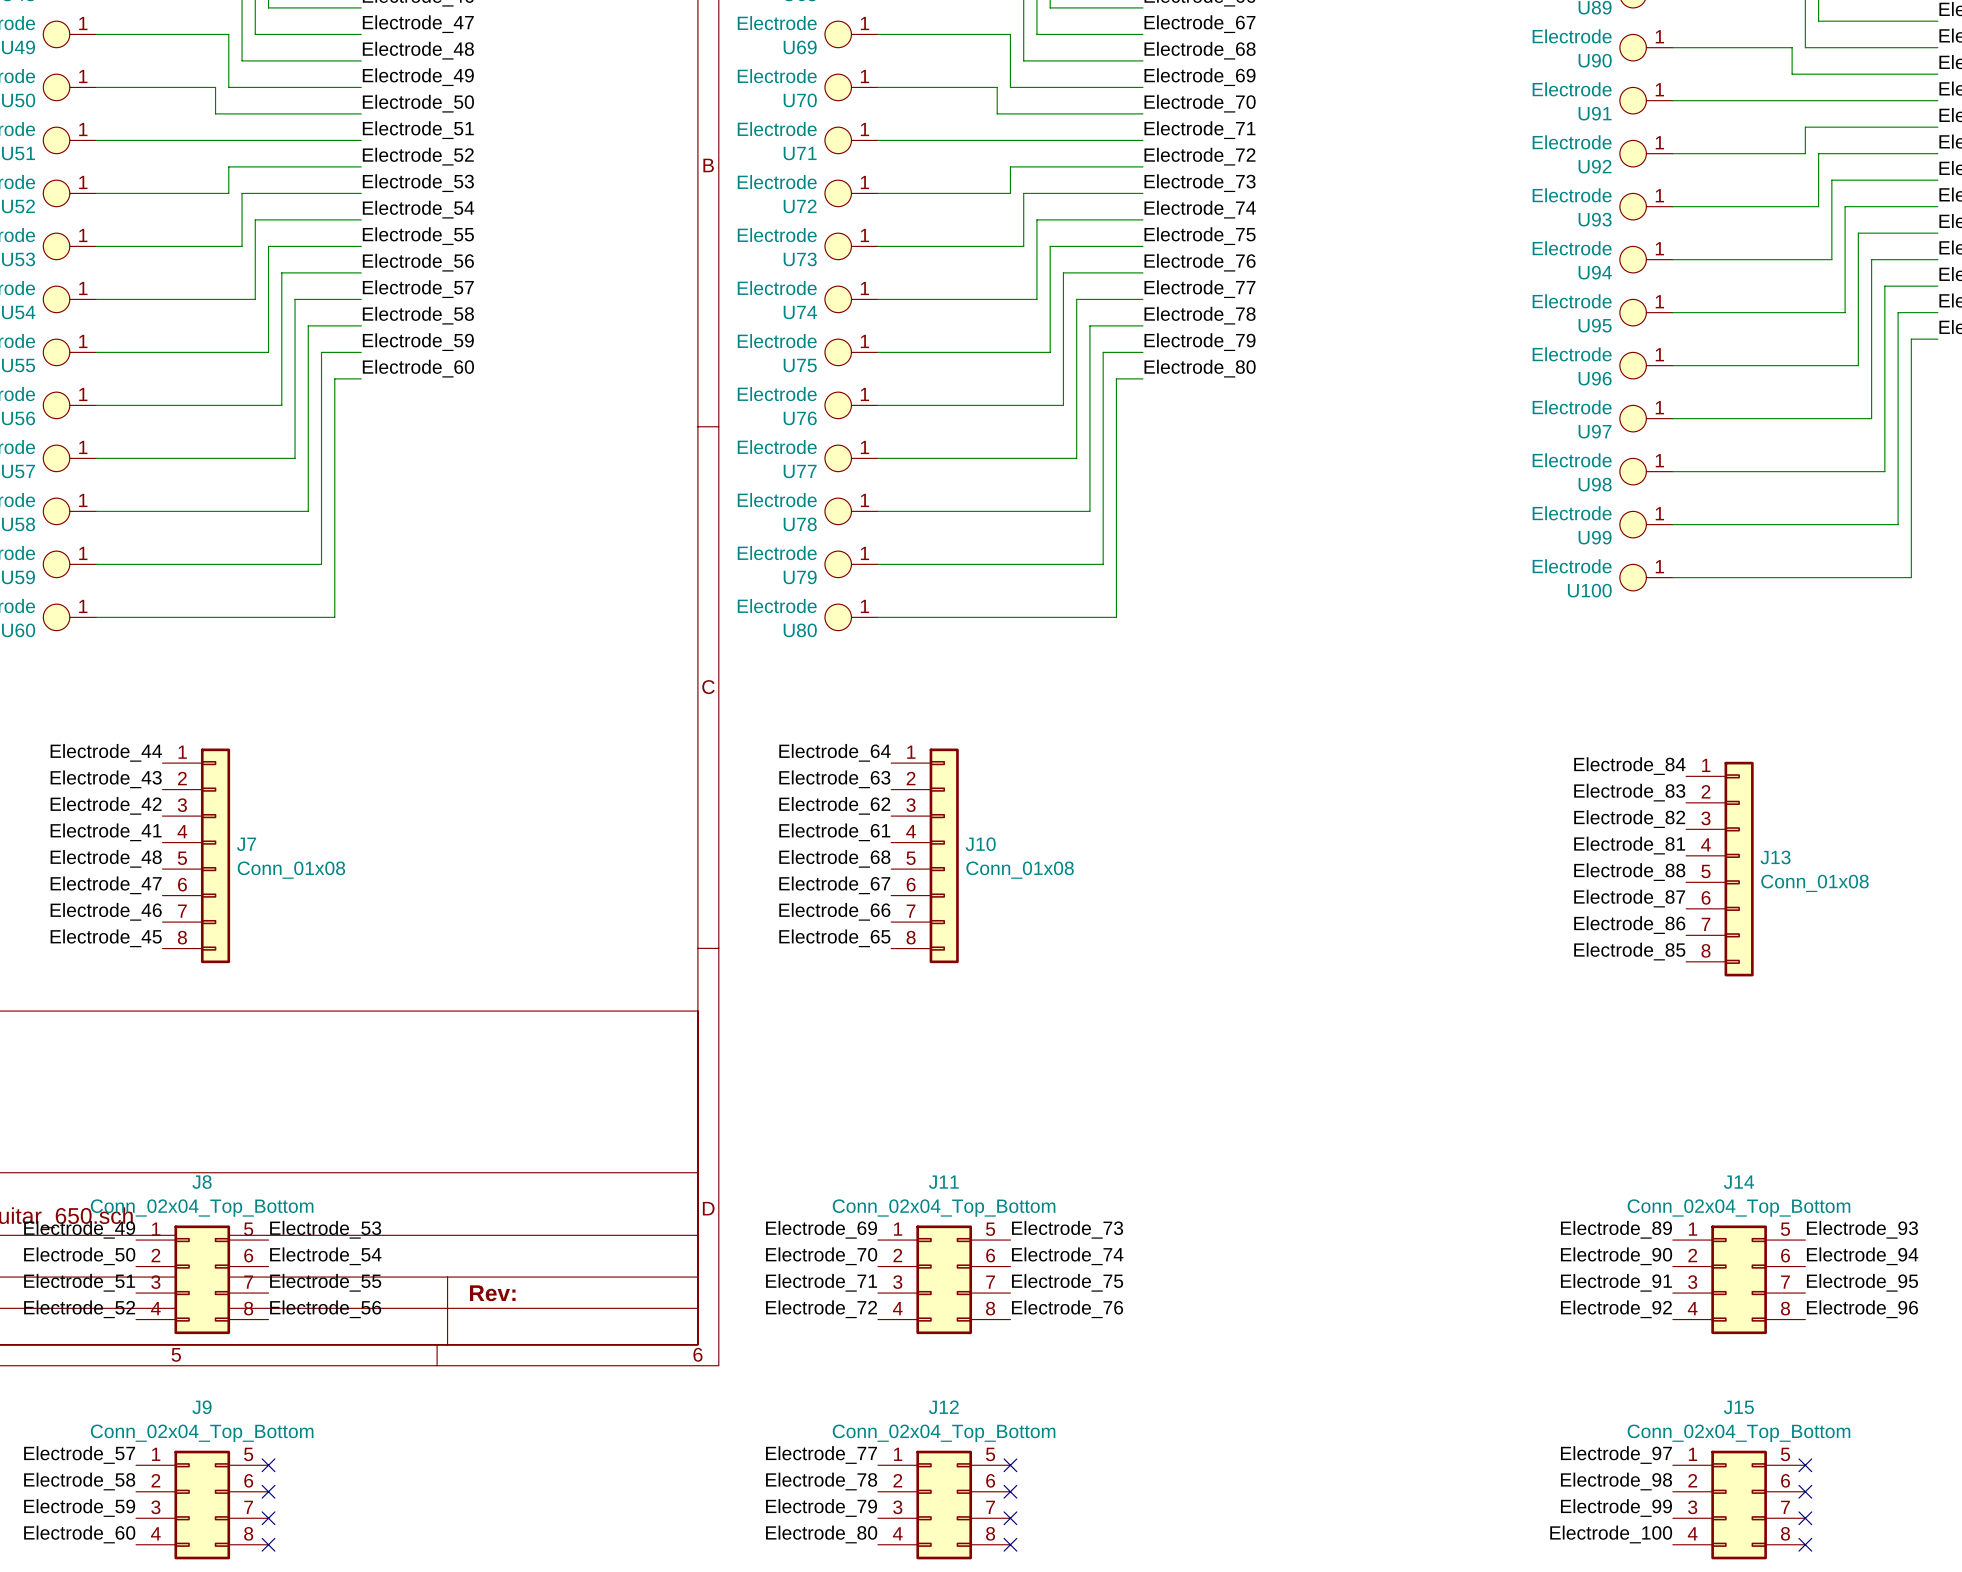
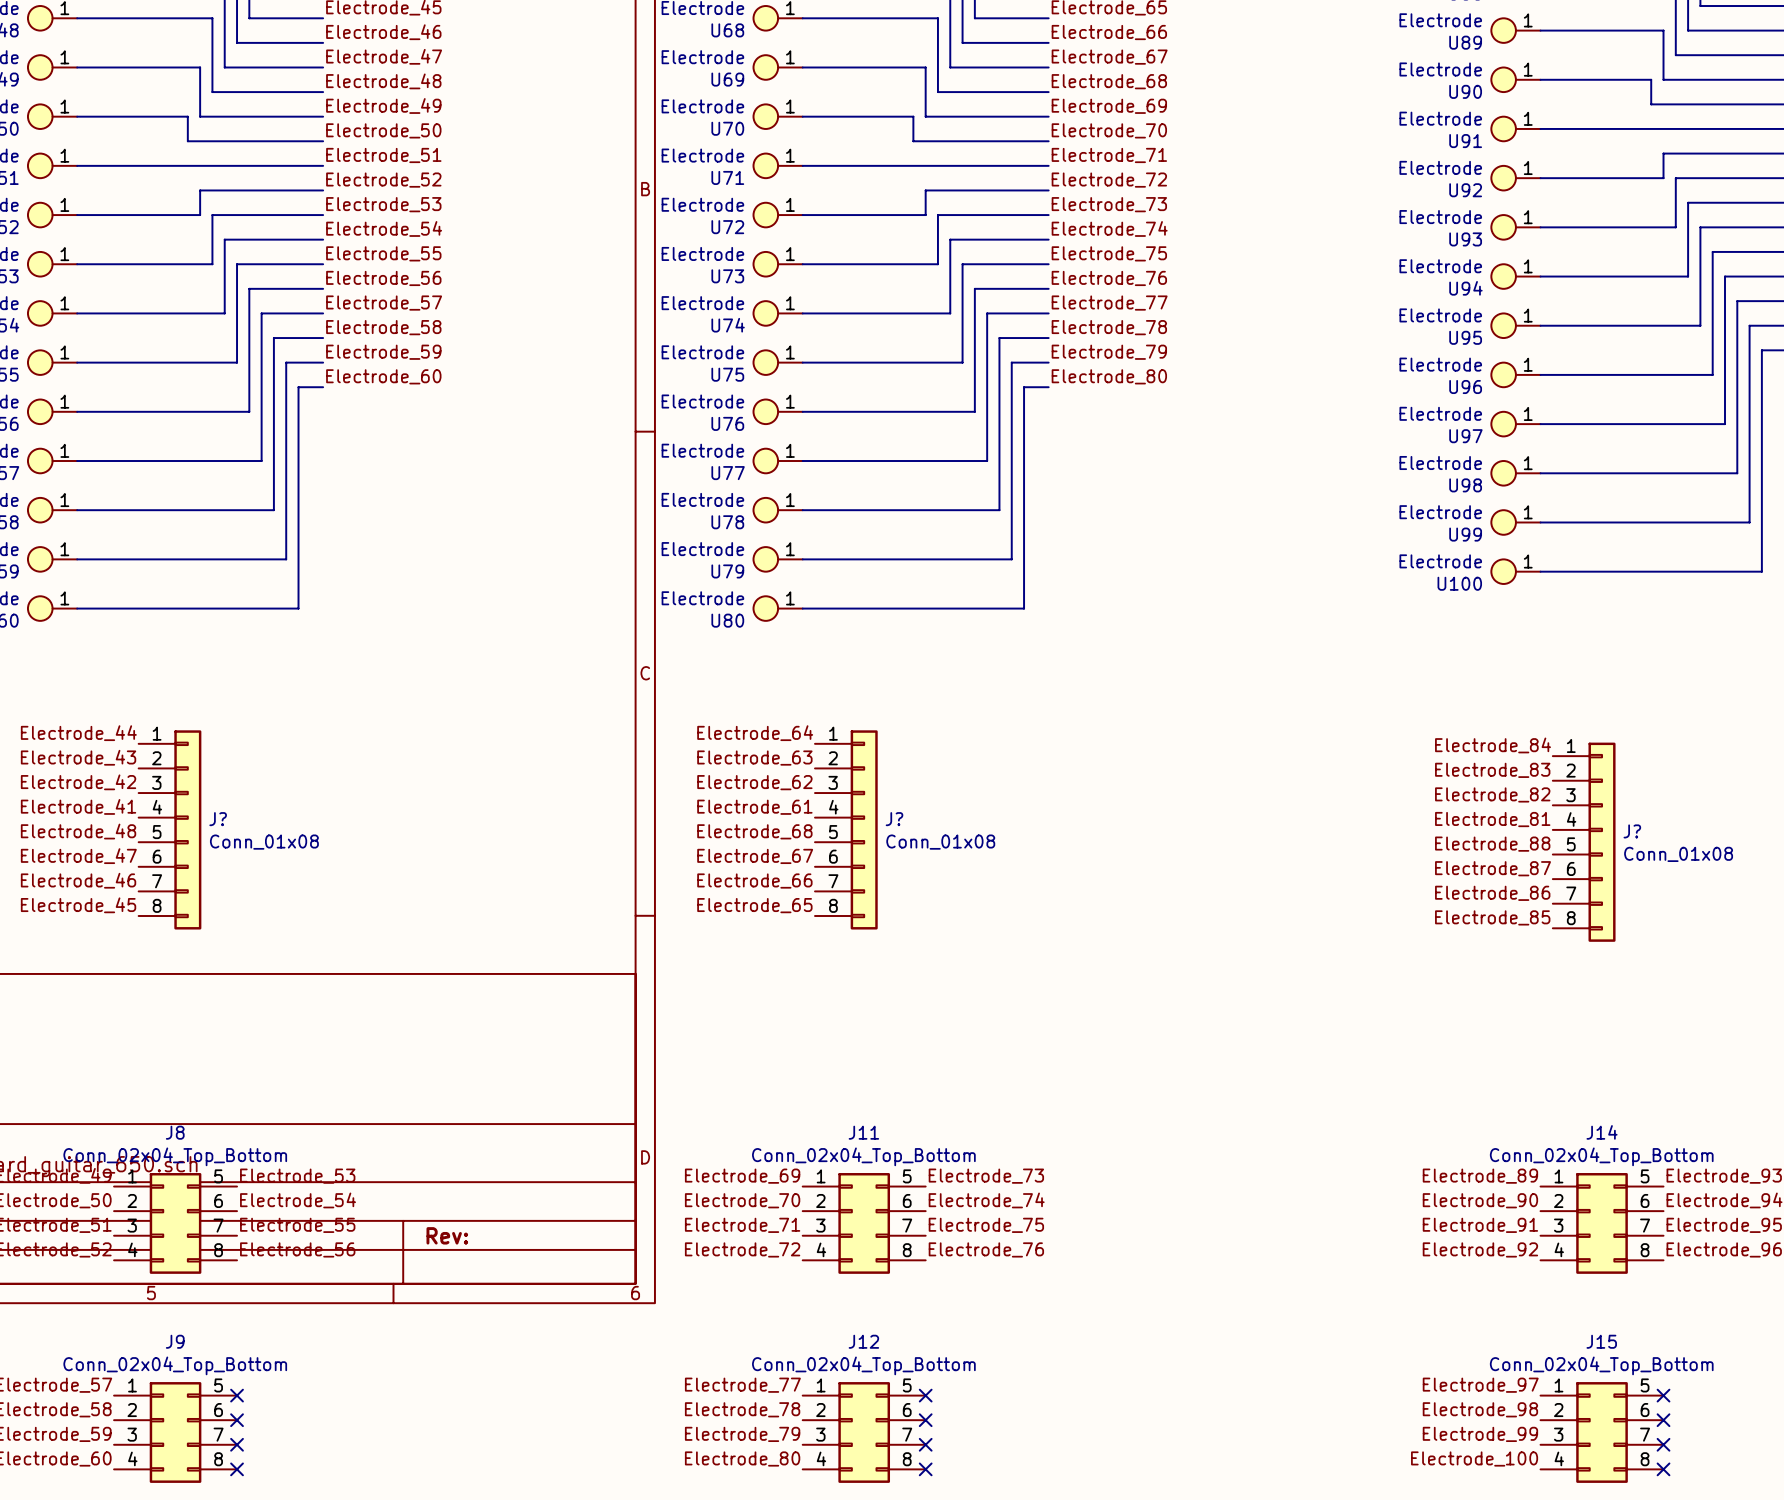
J7 name: J7 (246, 844) -> J? (218, 819)
J10 name: J10 (980, 844) -> J? (894, 819)
J13 name: J13 (1775, 857) -> J? (1632, 831)

